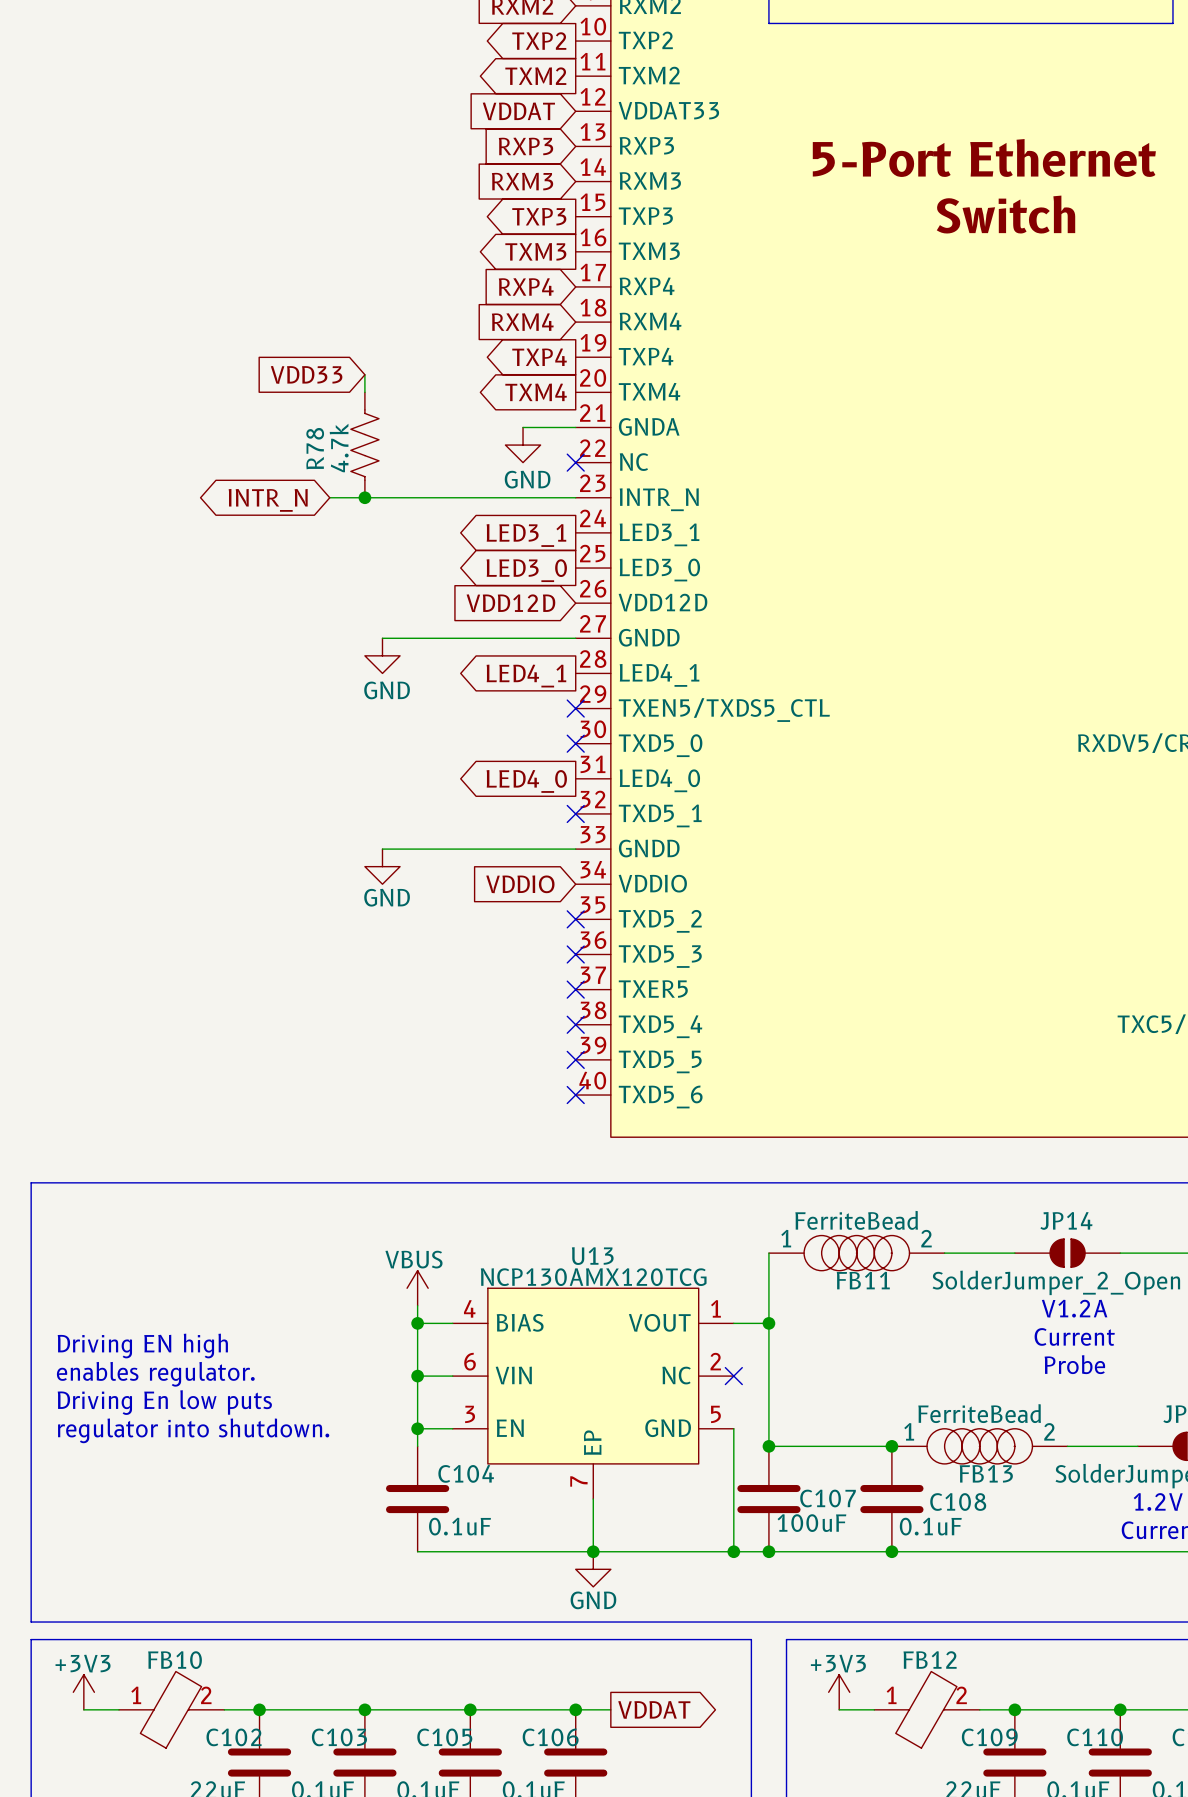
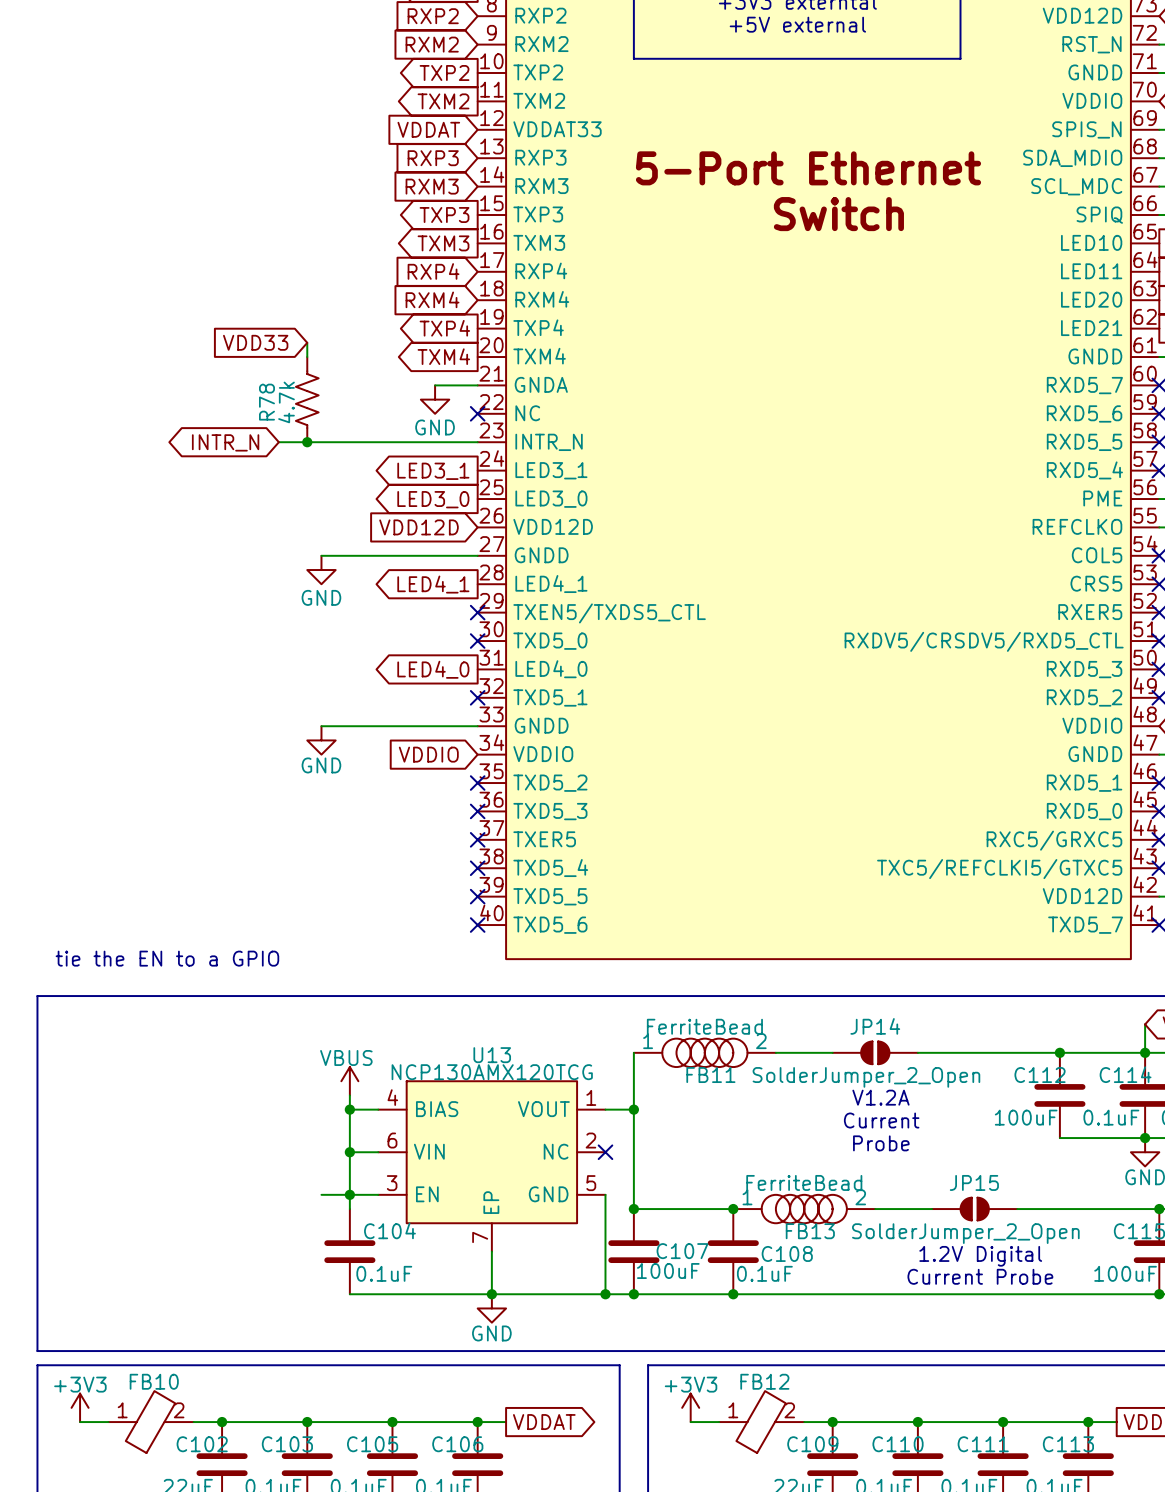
text: none -> tie the EN to a GPIO (167, 958)
text: Driving EN high (142, 1346) -> none
text: enables regulator. (155, 1374) -> none
text: Driving En low puts (164, 1402) -> none
wire: none -> (321, 1194) (349, 1194)
text: regulator into shutdown. (193, 1430) -> none

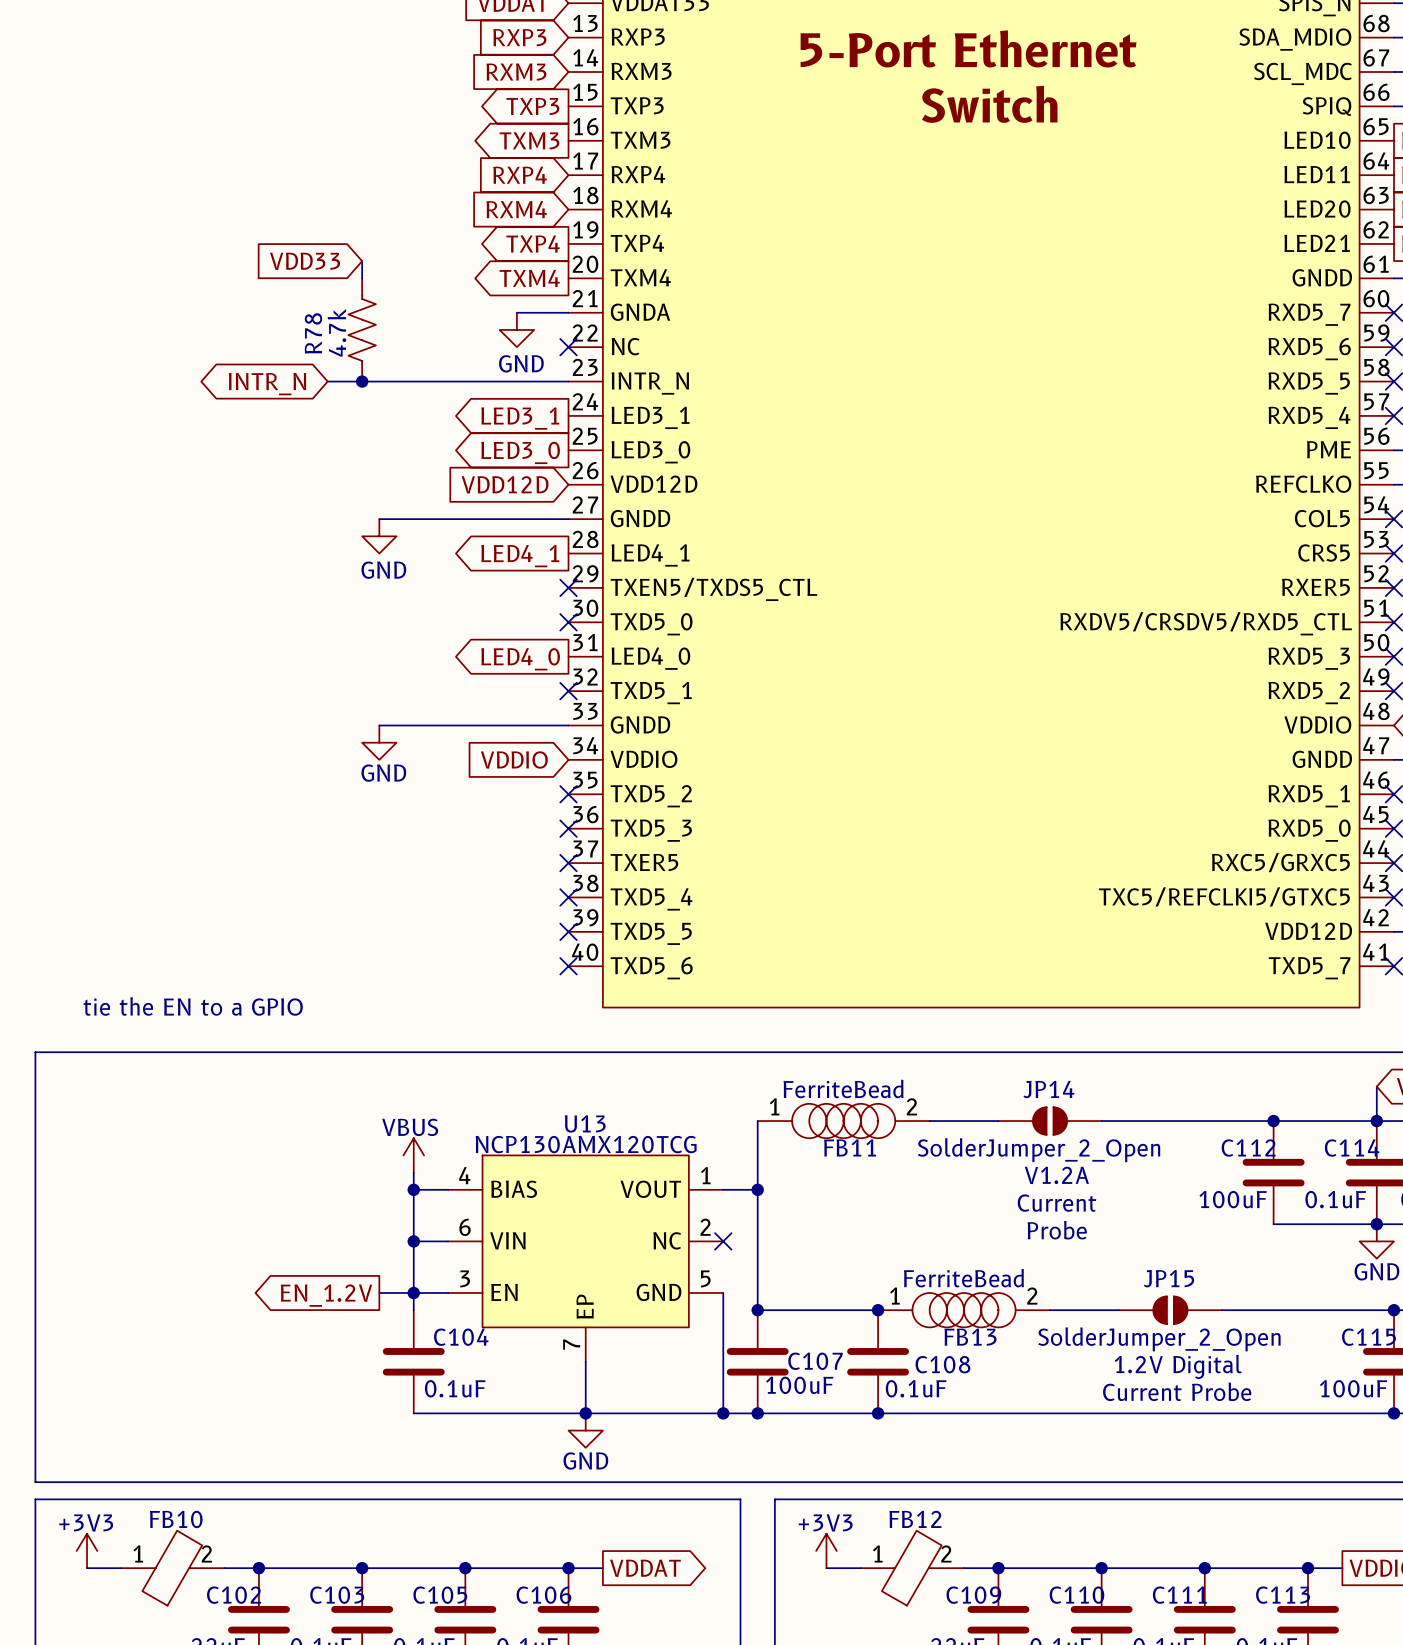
global label: none -> EN_1.2V (326, 1295)

